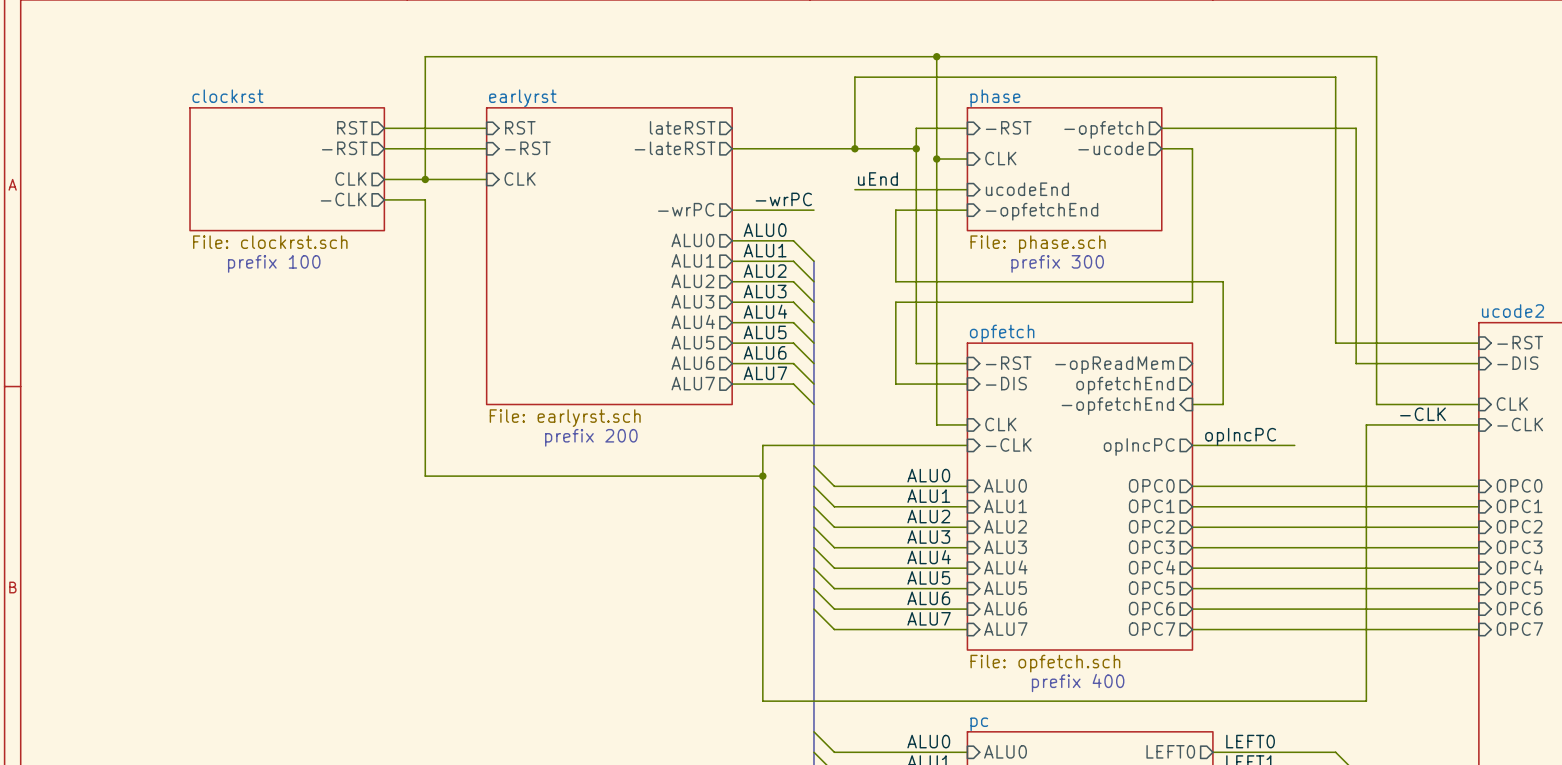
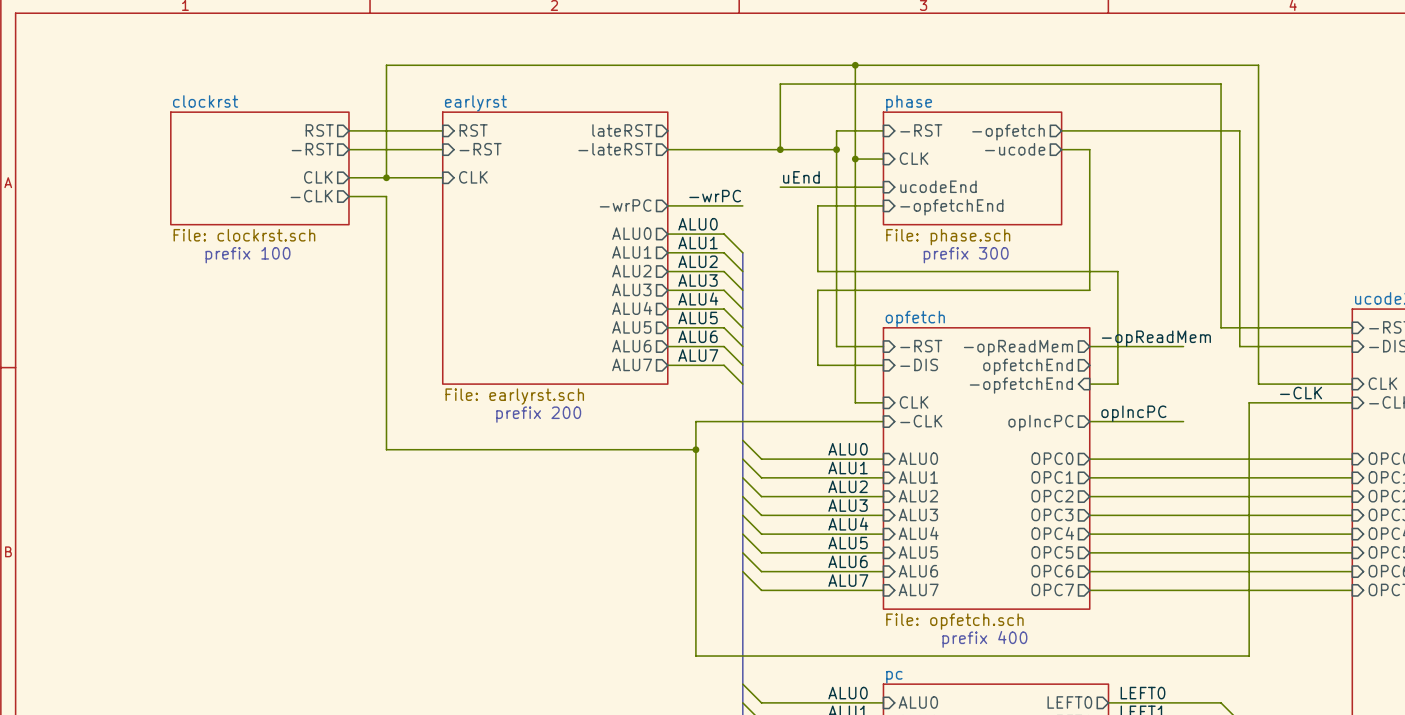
label: none -> -opReadMem (1156, 338)
wire: none -> (1089, 346) (1183, 346)

